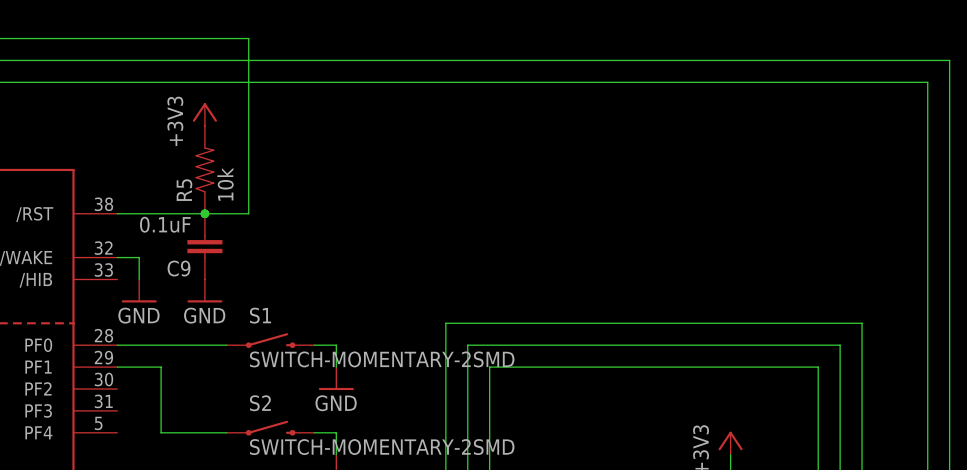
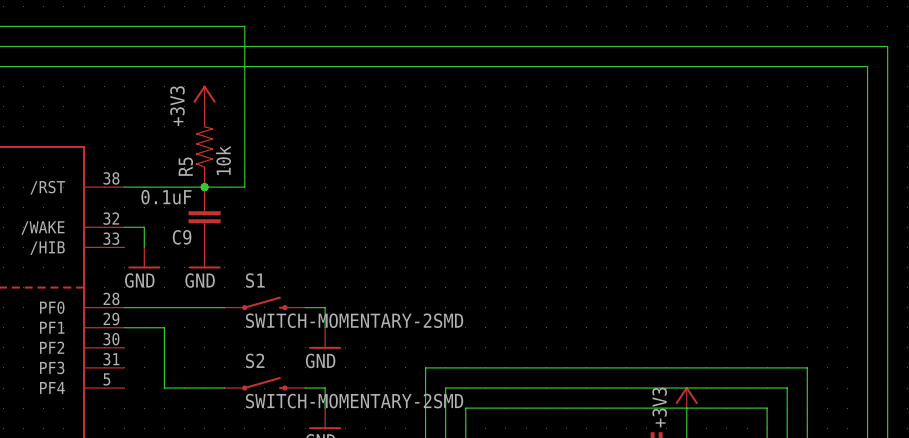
wire: (445, 410) (445, 323) (862, 323) (862, 410) -> (425, 367) (807, 367)
wire: (467, 432) (467, 345) (840, 345) (840, 432) -> (445, 388) (787, 388)
wire: (489, 454) (489, 367) (818, 367) (818, 454) -> (465, 408) (767, 408)

